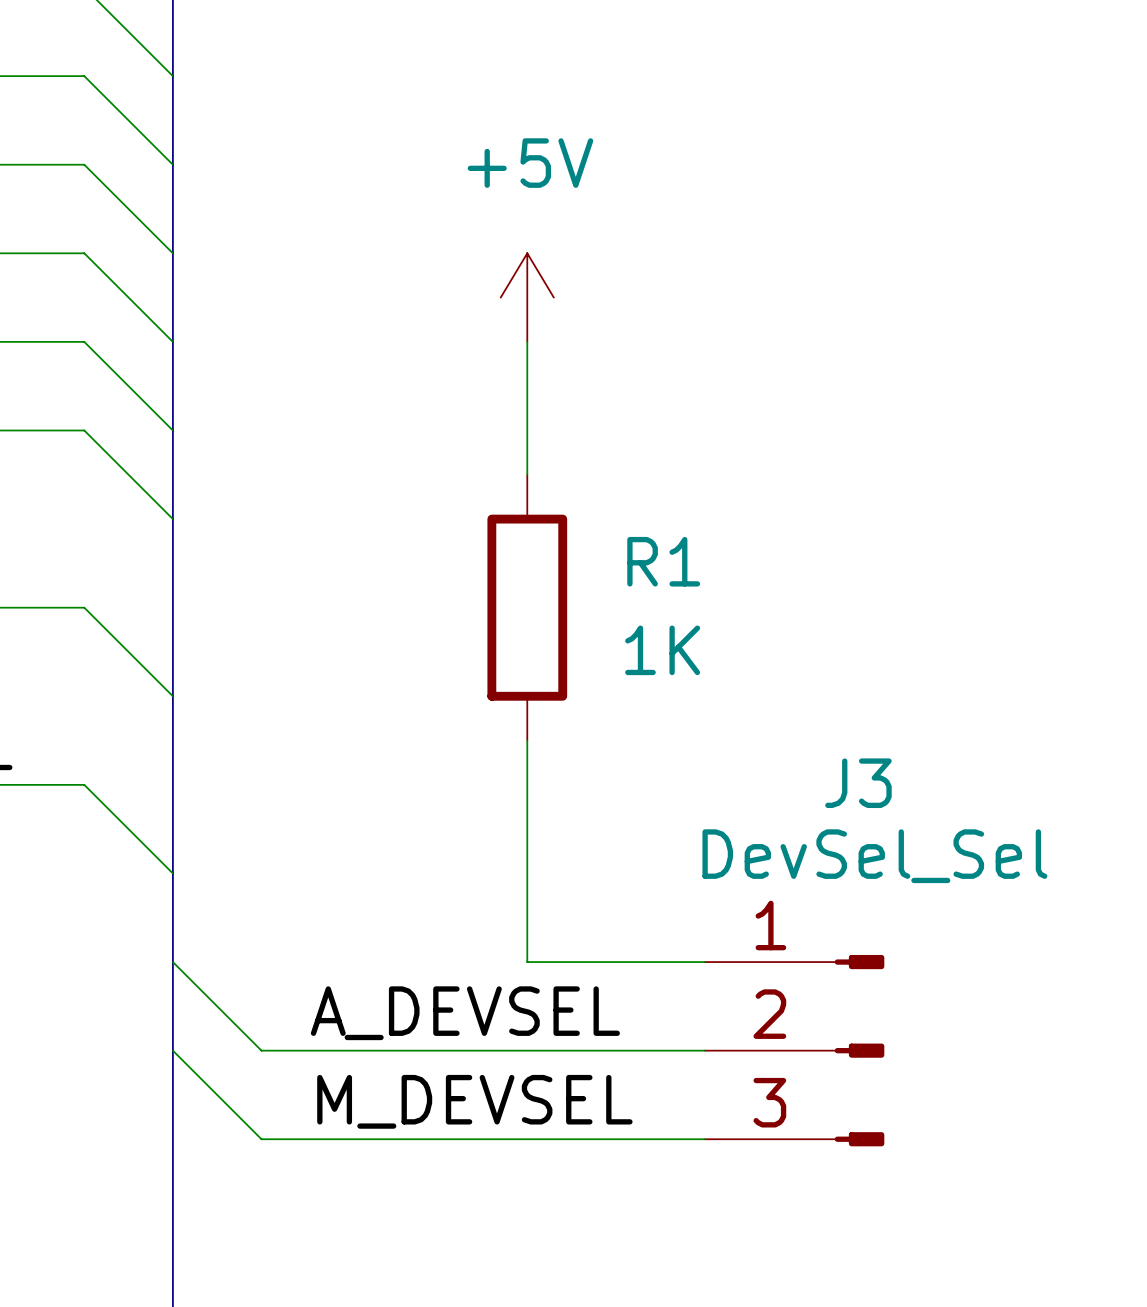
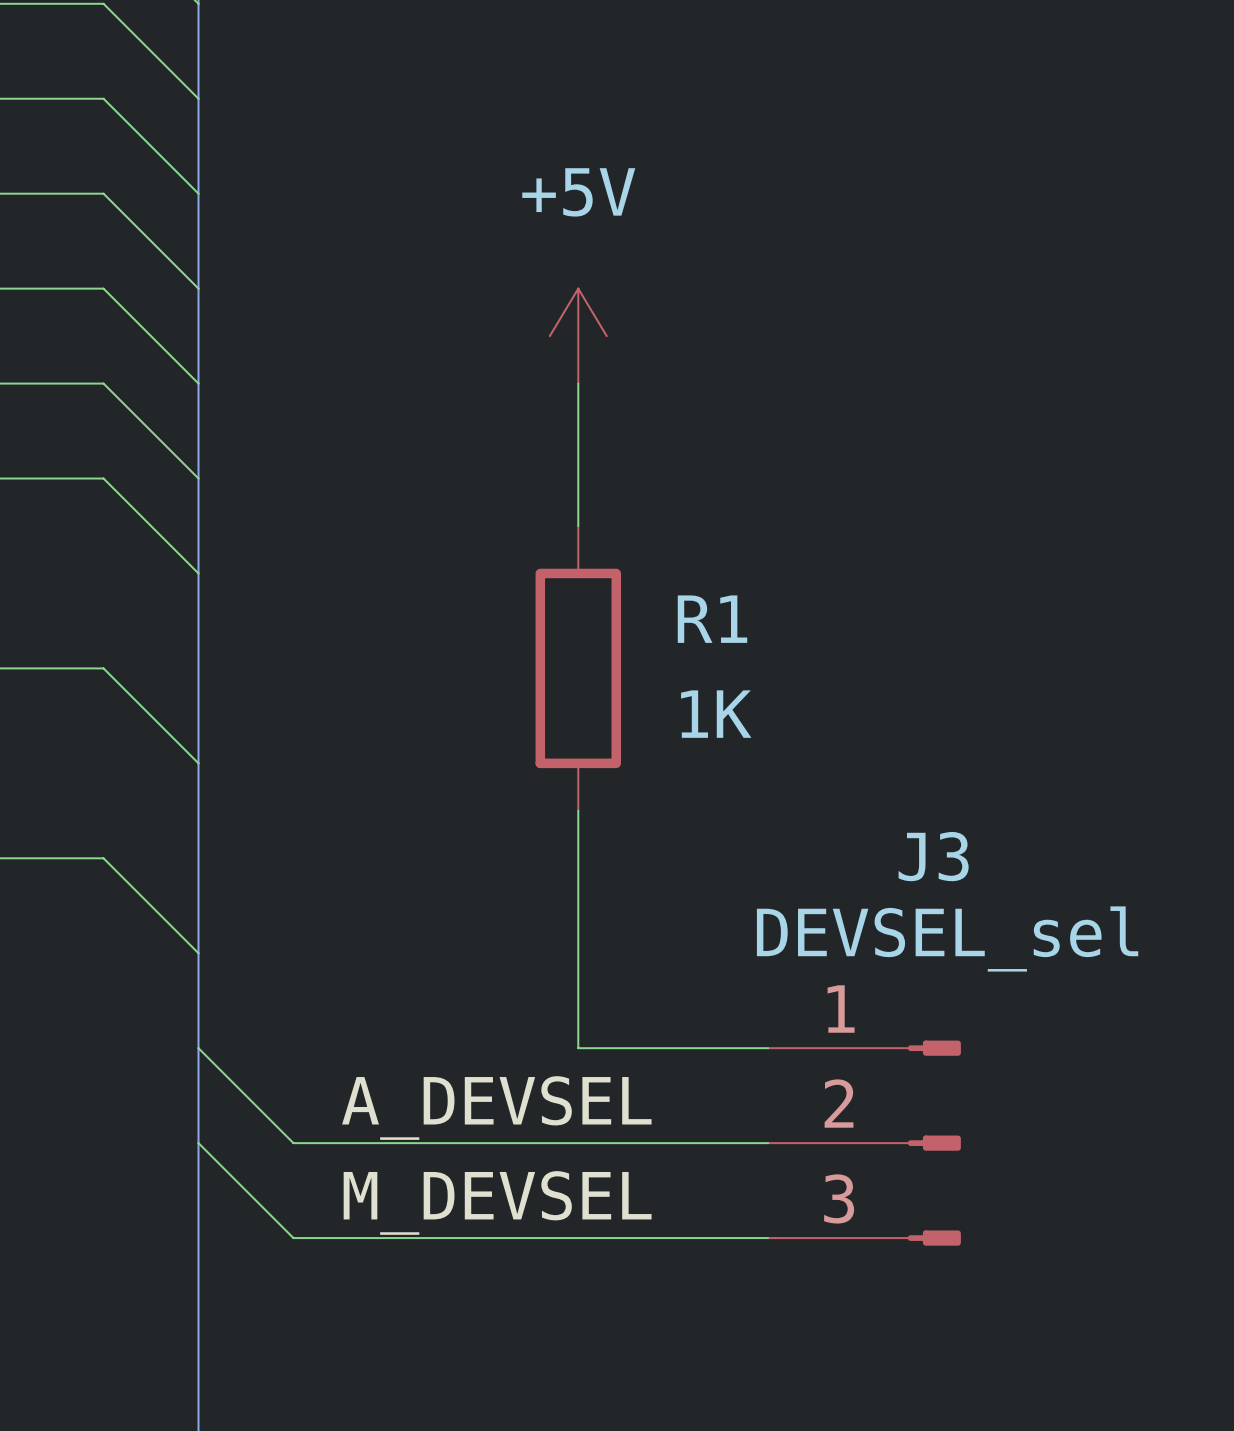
J3 value: DevSel_Sel (874, 856) -> DEVSEL_sel (947, 938)

